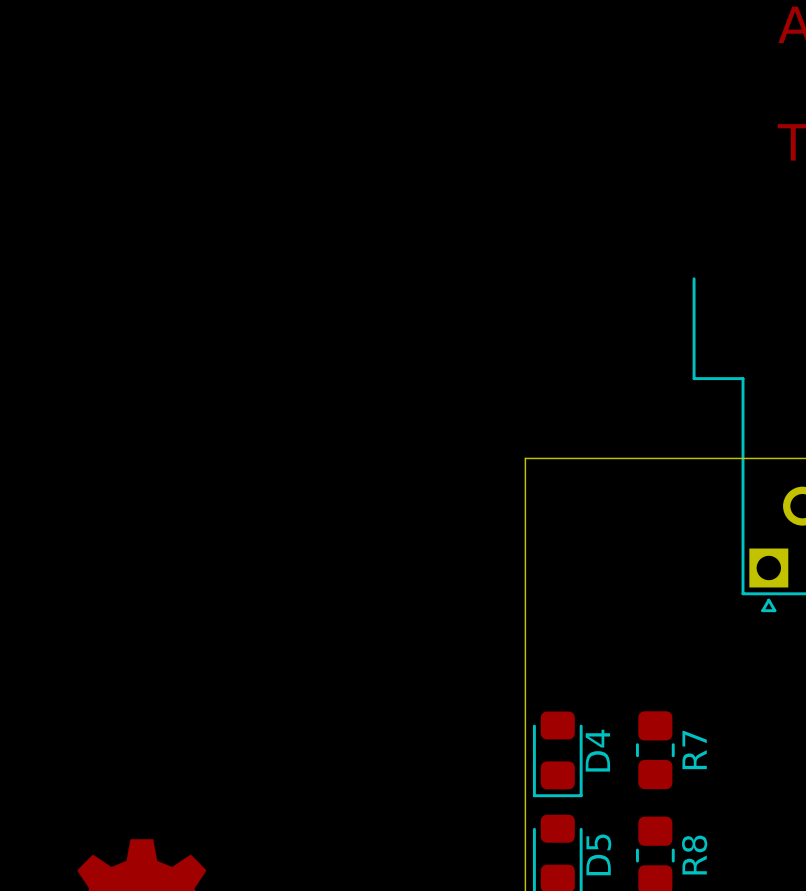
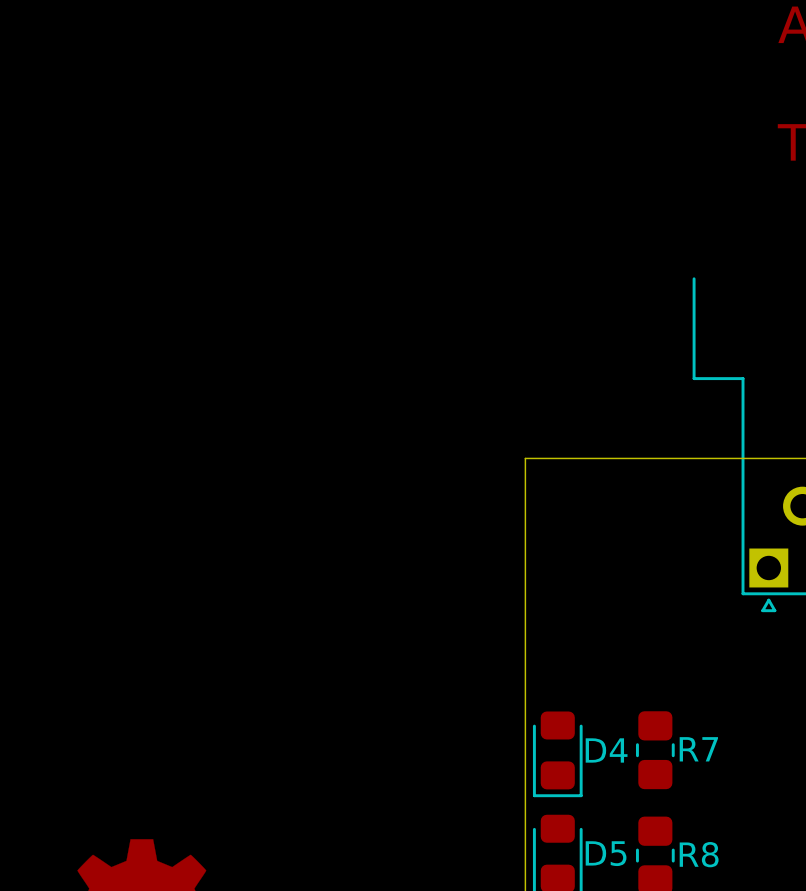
R7 name rotation: 0° (694, 749) -> 90° clockwise (698, 749)
D4 name rotation: 0° (597, 750) -> 90° clockwise (606, 750)
D5 name rotation: 0° (598, 854) -> 90° clockwise (606, 853)
R8 name rotation: 0° (694, 855) -> 90° clockwise (699, 854)

